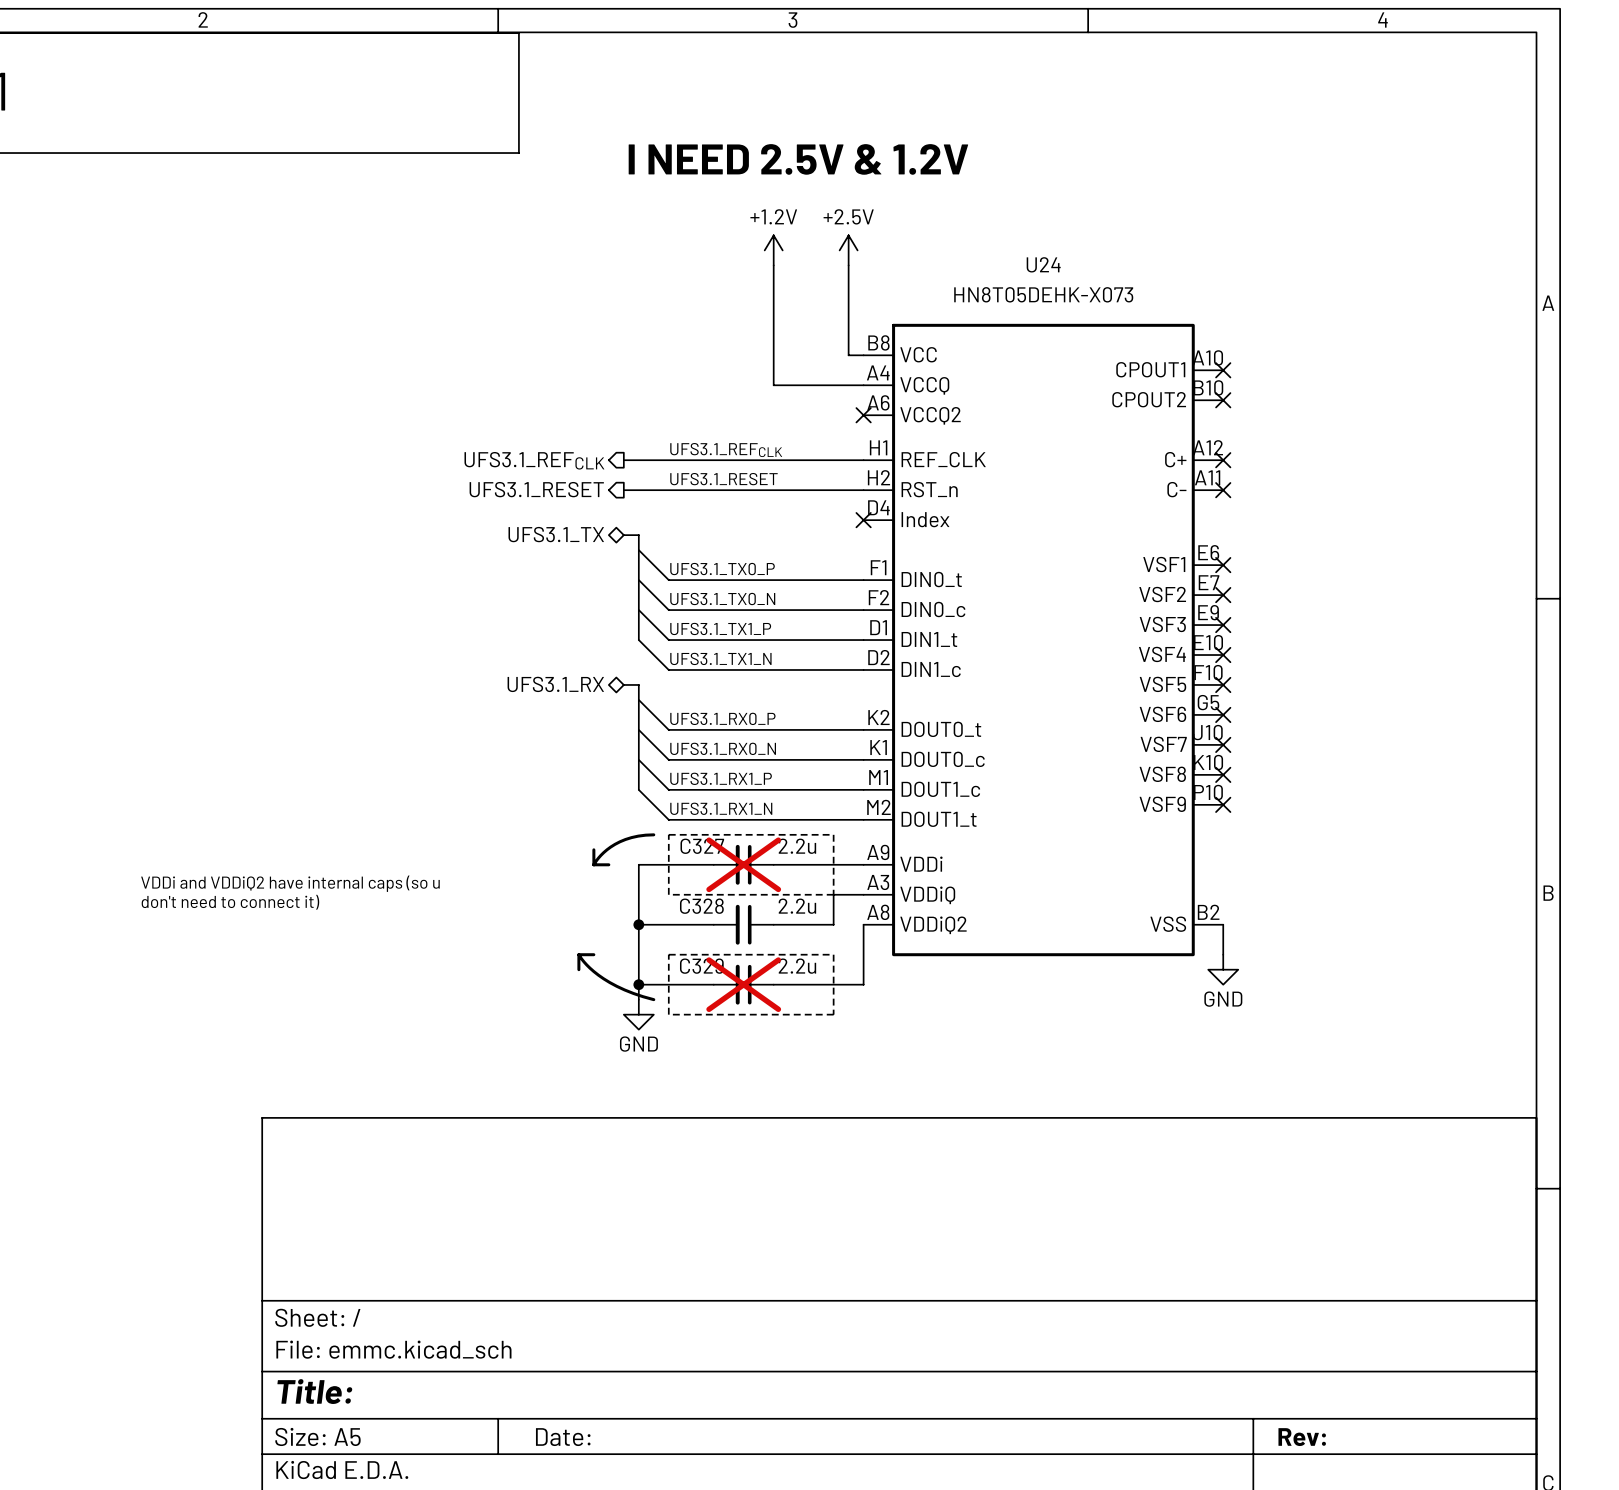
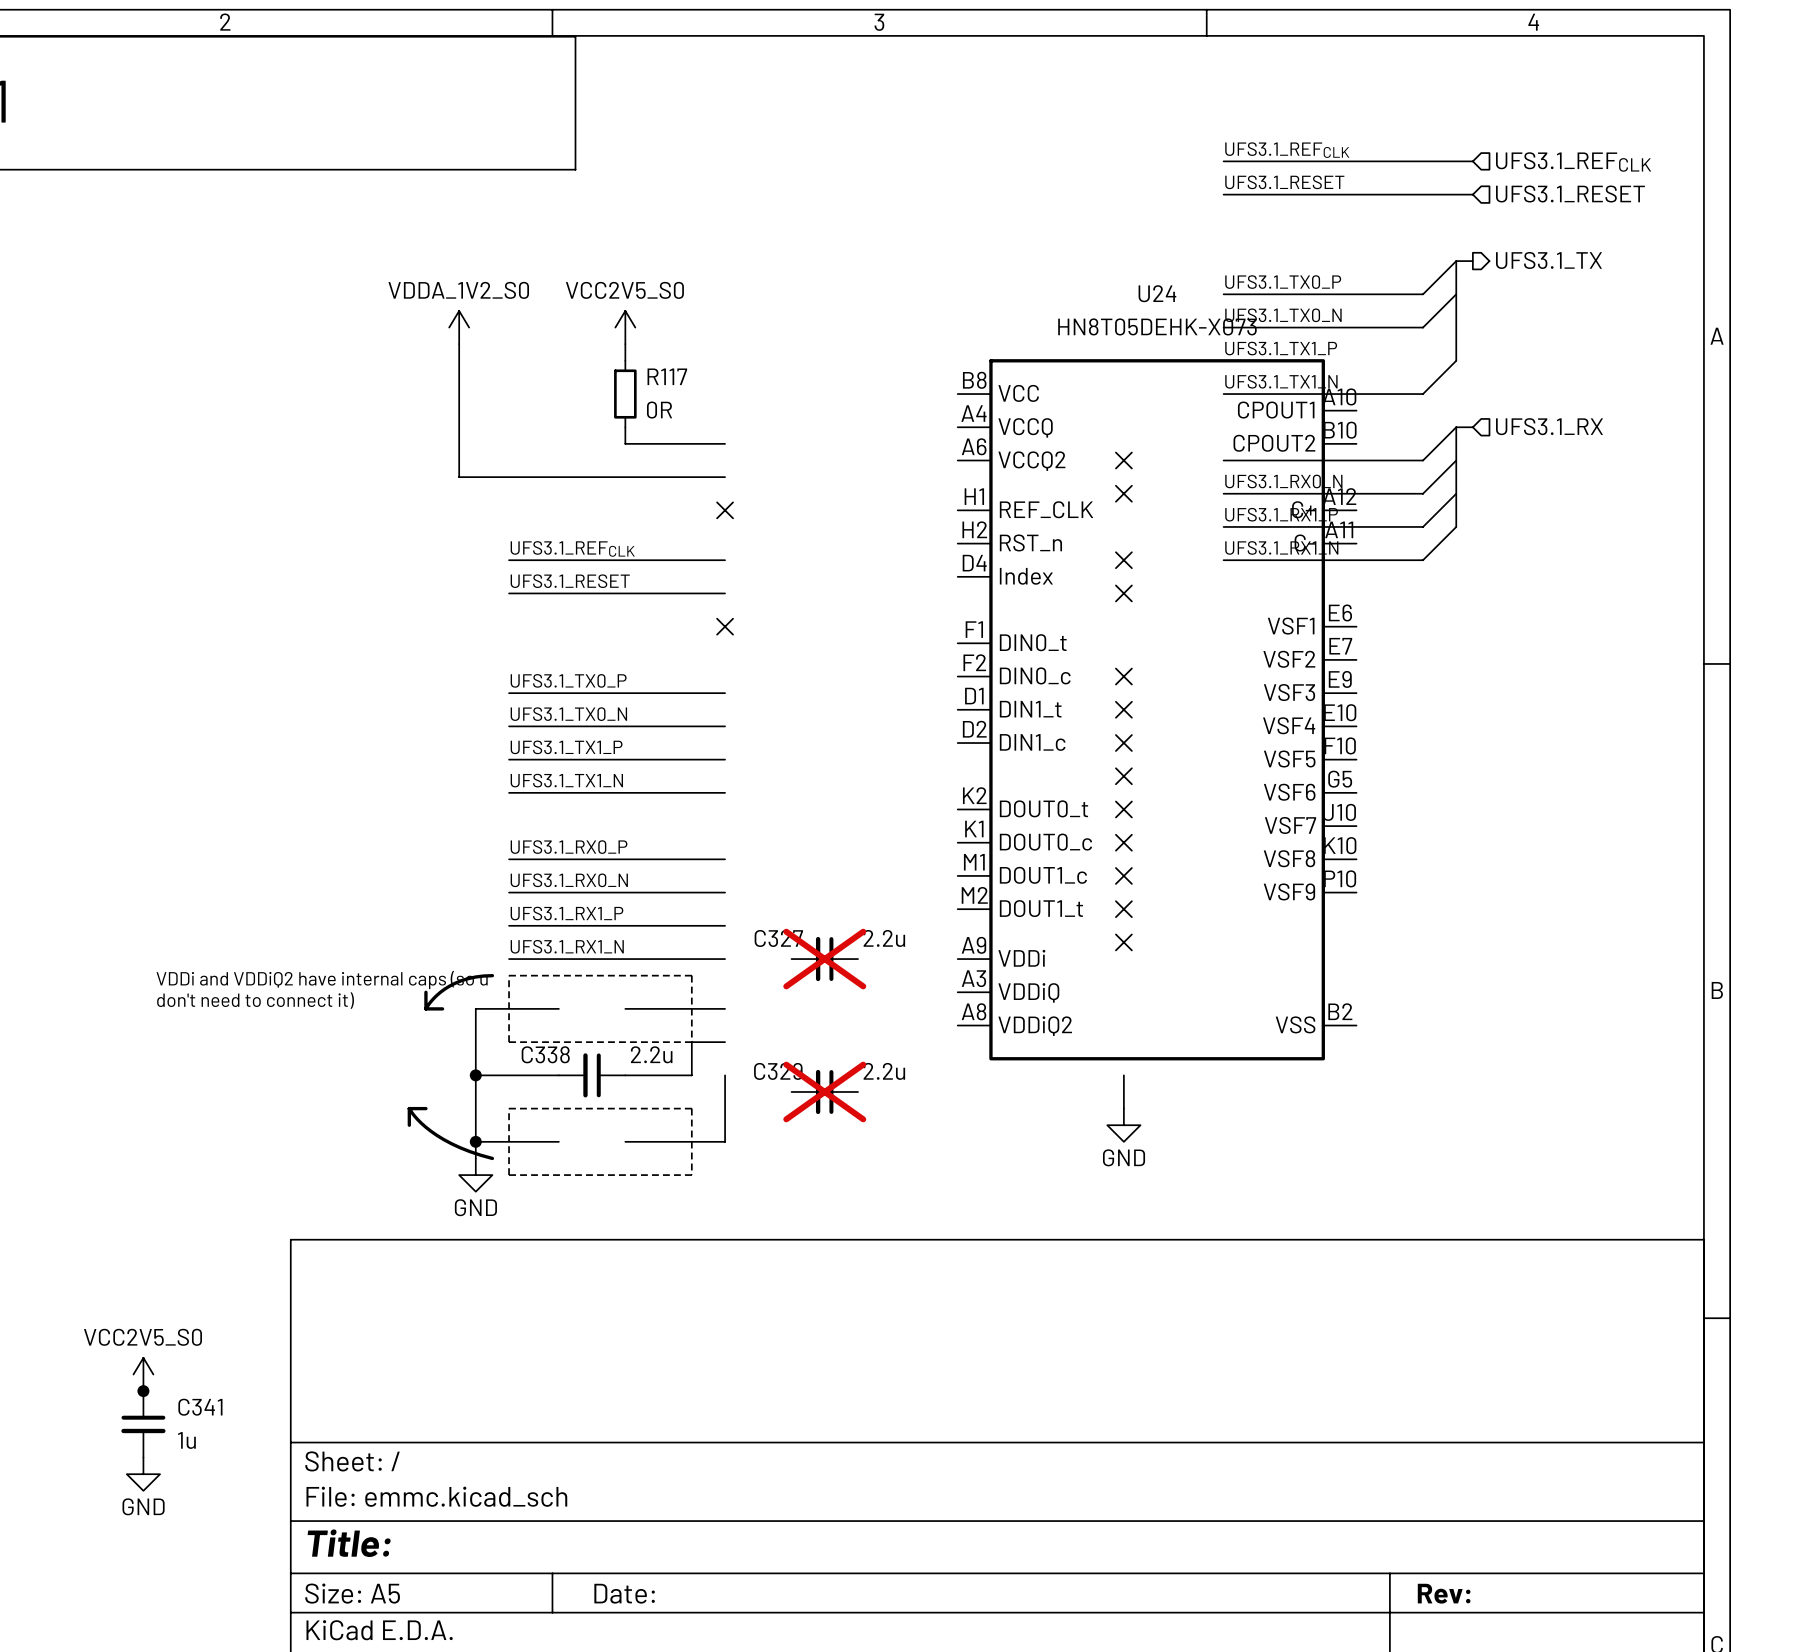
label: none -> UFS3.1_REFCLK (1287, 150)
wire: none -> (1223, 161) (1472, 161)
hierarchical label: none -> UFS3.1_REFCLK (1573, 161)
text: I NEED 2.5V & 1.2V (798, 159) -> none
label: none -> UFS3.1_RESET (1284, 182)
hierarchical label: none -> UFS3.1_RESET (1570, 193)
wire: none -> (1223, 194) (1472, 194)
hierarchical label: none -> UFS3.1_TX (1548, 260)
wire: none -> (1456, 261) (1423, 294) (1223, 294)
bus: none -> (1472, 261) (1456, 261) (1456, 360)
power symbol: +1.2V (773, 250) -> none
power symbol: +2.5V (848, 250) -> none
label: none -> UFS3.1_TX0_P (1283, 282)
wire: (773, 265) (773, 385) (863, 385) -> none
wire: (848, 265) (848, 355) (863, 355) -> none
wire: none -> (1456, 294) (1423, 327) (1223, 327)
label: none -> UFS3.1_TX0_N (1283, 315)
power symbol: none -> VDDA_1V2_S0 (459, 327)
power symbol: none -> VCC2V5_S0 (625, 327)
wire: none -> (459, 344) (459, 477) (725, 477)
wire: none -> (625, 344) (625, 360)
label: none -> UFS3.1_TX1_P (1281, 348)
wire: none -> (1456, 360) (1423, 394) (1223, 394)
label: none -> UFS3.1_TX1_N (1281, 381)
R117: none -> 0R (625, 394)
no-connect mark: (1223, 370) -> none
hierarchical label: none -> UFS3.1_RX (1549, 426)
wire: none -> (625, 427) (625, 443) (725, 443)
wire: none -> (1456, 427) (1423, 460) (1223, 460)
bus: none -> (1472, 427) (1456, 427) (1456, 526)
no-connect mark: (1223, 400) -> none
no-connect mark: (863, 415) -> none
no-connect mark: none -> (1123, 460)
wire: none -> (1456, 460) (1423, 493) (1223, 493)
label: none -> UFS3.1_RX0_N (1283, 481)
no-connect mark: none -> (1123, 493)
wire: none -> (1456, 493) (1423, 526) (1223, 526)
label position: UFS3.1_REFCLK (726, 450) -> UFS3.1_REFCLK (572, 548)
hierarchical label: UFS3.1_REFCLK (534, 460) -> none
wire: (623, 460) (863, 460) -> none
no-connect mark: none -> (725, 510)
no-connect mark: (1223, 460) -> none
label: none -> UFS3.1_RX1_P (1281, 514)
wire: none -> (1456, 526) (1423, 560) (1223, 560)
label position: UFS3.1_RESET (723, 479) -> UFS3.1_RESET (570, 581)
hierarchical label: UFS3.1_RESET (536, 489) -> none
wire: (623, 490) (863, 490) -> none
no-connect mark: (1223, 490) -> none
label: none -> UFS3.1_RX1_N (1281, 547)
wire: none -> (509, 560) (725, 560)
no-connect mark: none -> (1123, 560)
no-connect mark: (863, 520) -> none
hierarchical label: UFS3.1_TX (556, 534) -> none
wire: none -> (509, 593) (725, 593)
bus: (623, 535) (638, 535) (638, 640) -> none
no-connect mark: none -> (1123, 593)
wire: (638, 550) (668, 580) (863, 580) -> none
no-connect mark: none -> (725, 626)
no-connect mark: (1223, 565) -> none
label position: UFS3.1_TX0_P (722, 569) -> UFS3.1_TX0_P (568, 680)
wire: (638, 580) (668, 610) (863, 610) -> none
no-connect mark: (1223, 595) -> none
label position: UFS3.1_TX0_N (722, 599) -> UFS3.1_TX0_N (568, 714)
wire: (638, 610) (668, 640) (863, 640) -> none
no-connect mark: none -> (1123, 676)
wire: none -> (509, 693) (725, 693)
no-connect mark: (1223, 625) -> none
label position: UFS3.1_TX1_P (720, 628) -> UFS3.1_TX1_P (566, 747)
wire: (638, 640) (668, 669) (863, 669) -> none
no-connect mark: none -> (1123, 709)
wire: none -> (509, 726) (725, 726)
no-connect mark: (1223, 655) -> none
label position: UFS3.1_TX1_N (720, 658) -> UFS3.1_TX1_N (566, 780)
no-connect mark: none -> (1123, 743)
wire: none -> (509, 759) (725, 759)
hierarchical label: UFS3.1_RX (555, 684) -> none
bus: (623, 684) (638, 684) (638, 789) -> none
no-connect mark: (1223, 684) -> none
wire: (638, 699) (668, 729) (863, 729) -> none
no-connect mark: none -> (1123, 776)
wire: none -> (509, 792) (725, 792)
no-connect mark: (1223, 714) -> none
label position: UFS3.1_RX0_P (722, 718) -> UFS3.1_RX0_P (569, 847)
wire: (638, 729) (668, 759) (863, 759) -> none
no-connect mark: none -> (1123, 809)
no-connect mark: (1223, 744) -> none
label position: UFS3.1_RX0_N (723, 748) -> UFS3.1_RX0_N (569, 880)
wire: (638, 759) (668, 789) (863, 789) -> none
no-connect mark: none -> (1123, 842)
wire: none -> (509, 859) (725, 859)
no-connect mark: (1223, 774) -> none
label position: UFS3.1_RX1_P (721, 778) -> UFS3.1_RX1_P (566, 913)
wire: (638, 789) (668, 819) (863, 819) -> none
no-connect mark: none -> (1123, 875)
wire: none -> (509, 892) (725, 892)
no-connect mark: (1223, 804) -> none
label position: UFS3.1_RX1_N (721, 808) -> UFS3.1_RX1_N (567, 946)
no-connect mark: none -> (1123, 909)
wire: none -> (509, 925) (725, 925)
line: (653, 834) (638, 836) (619, 841) (603, 852) (593, 864) -> (492, 975) (475, 977) (454, 983) (436, 995) (425, 1008)
line: (668, 834) (833, 834) (833, 894) (668, 894) (668, 834) -> (509, 975) (691, 975) (691, 1042) (509, 1042) (509, 975)
line: (593, 849) (593, 864) -> (425, 992) (425, 1008)
no-connect mark: none -> (1123, 942)
line: (593, 864) (608, 864) -> (425, 1008) (442, 1008)
wire: (638, 864) (638, 999) -> (708, 959) (509, 959)
wire: (653, 864) (713, 864) -> none
wire: (773, 864) (863, 864) -> (625, 1008) (725, 1008)
wire: (863, 894) (833, 894) (833, 924) (773, 924) -> (725, 1042) (691, 1042) (691, 1075) (625, 1075)
wire: none -> (558, 1008) (475, 1008) (475, 1158)
wire: (638, 924) (713, 924) -> (475, 1075) (558, 1075)
junction: (638, 924) -> none
C328: 2.2u (743, 924) -> none
wire: (863, 924) (863, 984) (773, 984) -> (725, 1075) (725, 1141) (625, 1141)
wire: (1223, 924) (1223, 954) -> (1123, 1075) (1123, 1108)
line: (578, 954) (593, 954) -> (409, 1108) (425, 1108)
line: (578, 954) (578, 969) -> (409, 1108) (409, 1125)
line: (578, 954) (590, 968) (609, 982) (633, 993) (653, 999) -> (409, 1108) (421, 1123) (443, 1139) (469, 1151) (492, 1158)
line: (668, 954) (668, 1014) (833, 1014) (833, 954) (668, 954) -> (509, 1108) (509, 1175) (691, 1175) (691, 1108) (509, 1108)
junction: none -> (475, 1075)
C338: none -> 2.2u (592, 1075)
power symbol: GND (1223, 969) -> none
wire: (638, 984) (713, 984) -> (475, 1141) (558, 1141)
junction: (638, 984) -> none
power symbol: GND (638, 1014) -> none
power symbol: none -> GND (1123, 1125)
junction: none -> (475, 1141)
power symbol: none -> GND (475, 1175)
power symbol: none -> VCC2V5_S0 (143, 1374)
junction: none -> (143, 1391)
C341: none -> 1u (143, 1424)
power symbol: none -> GND (143, 1474)

